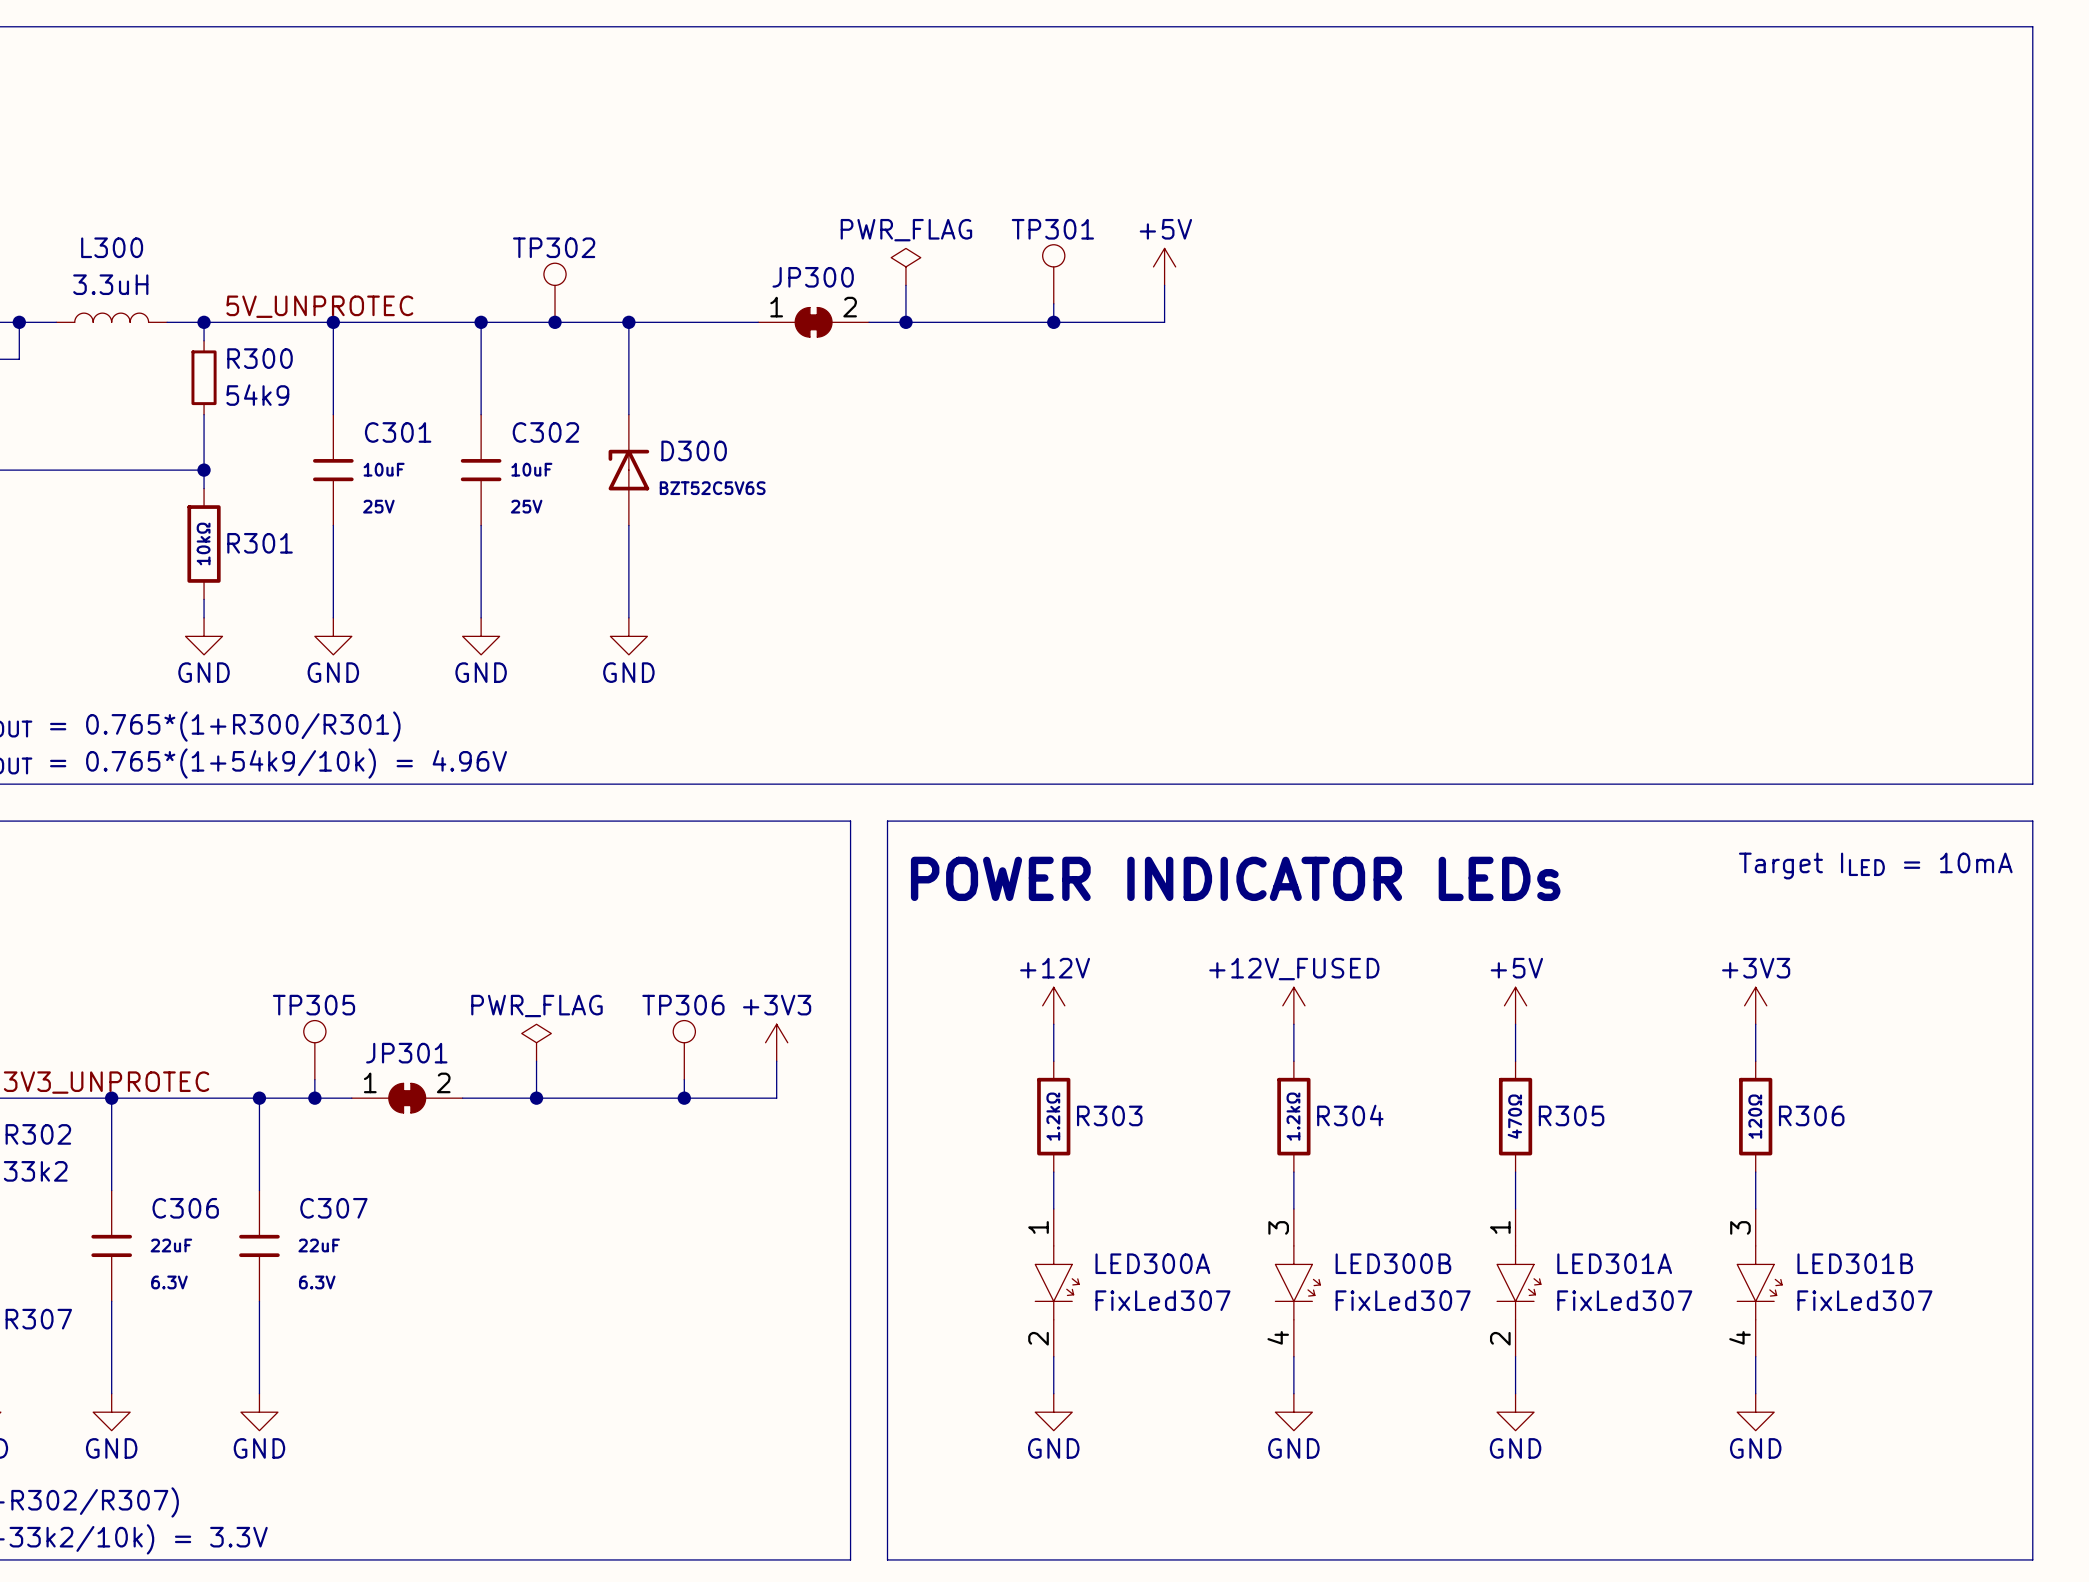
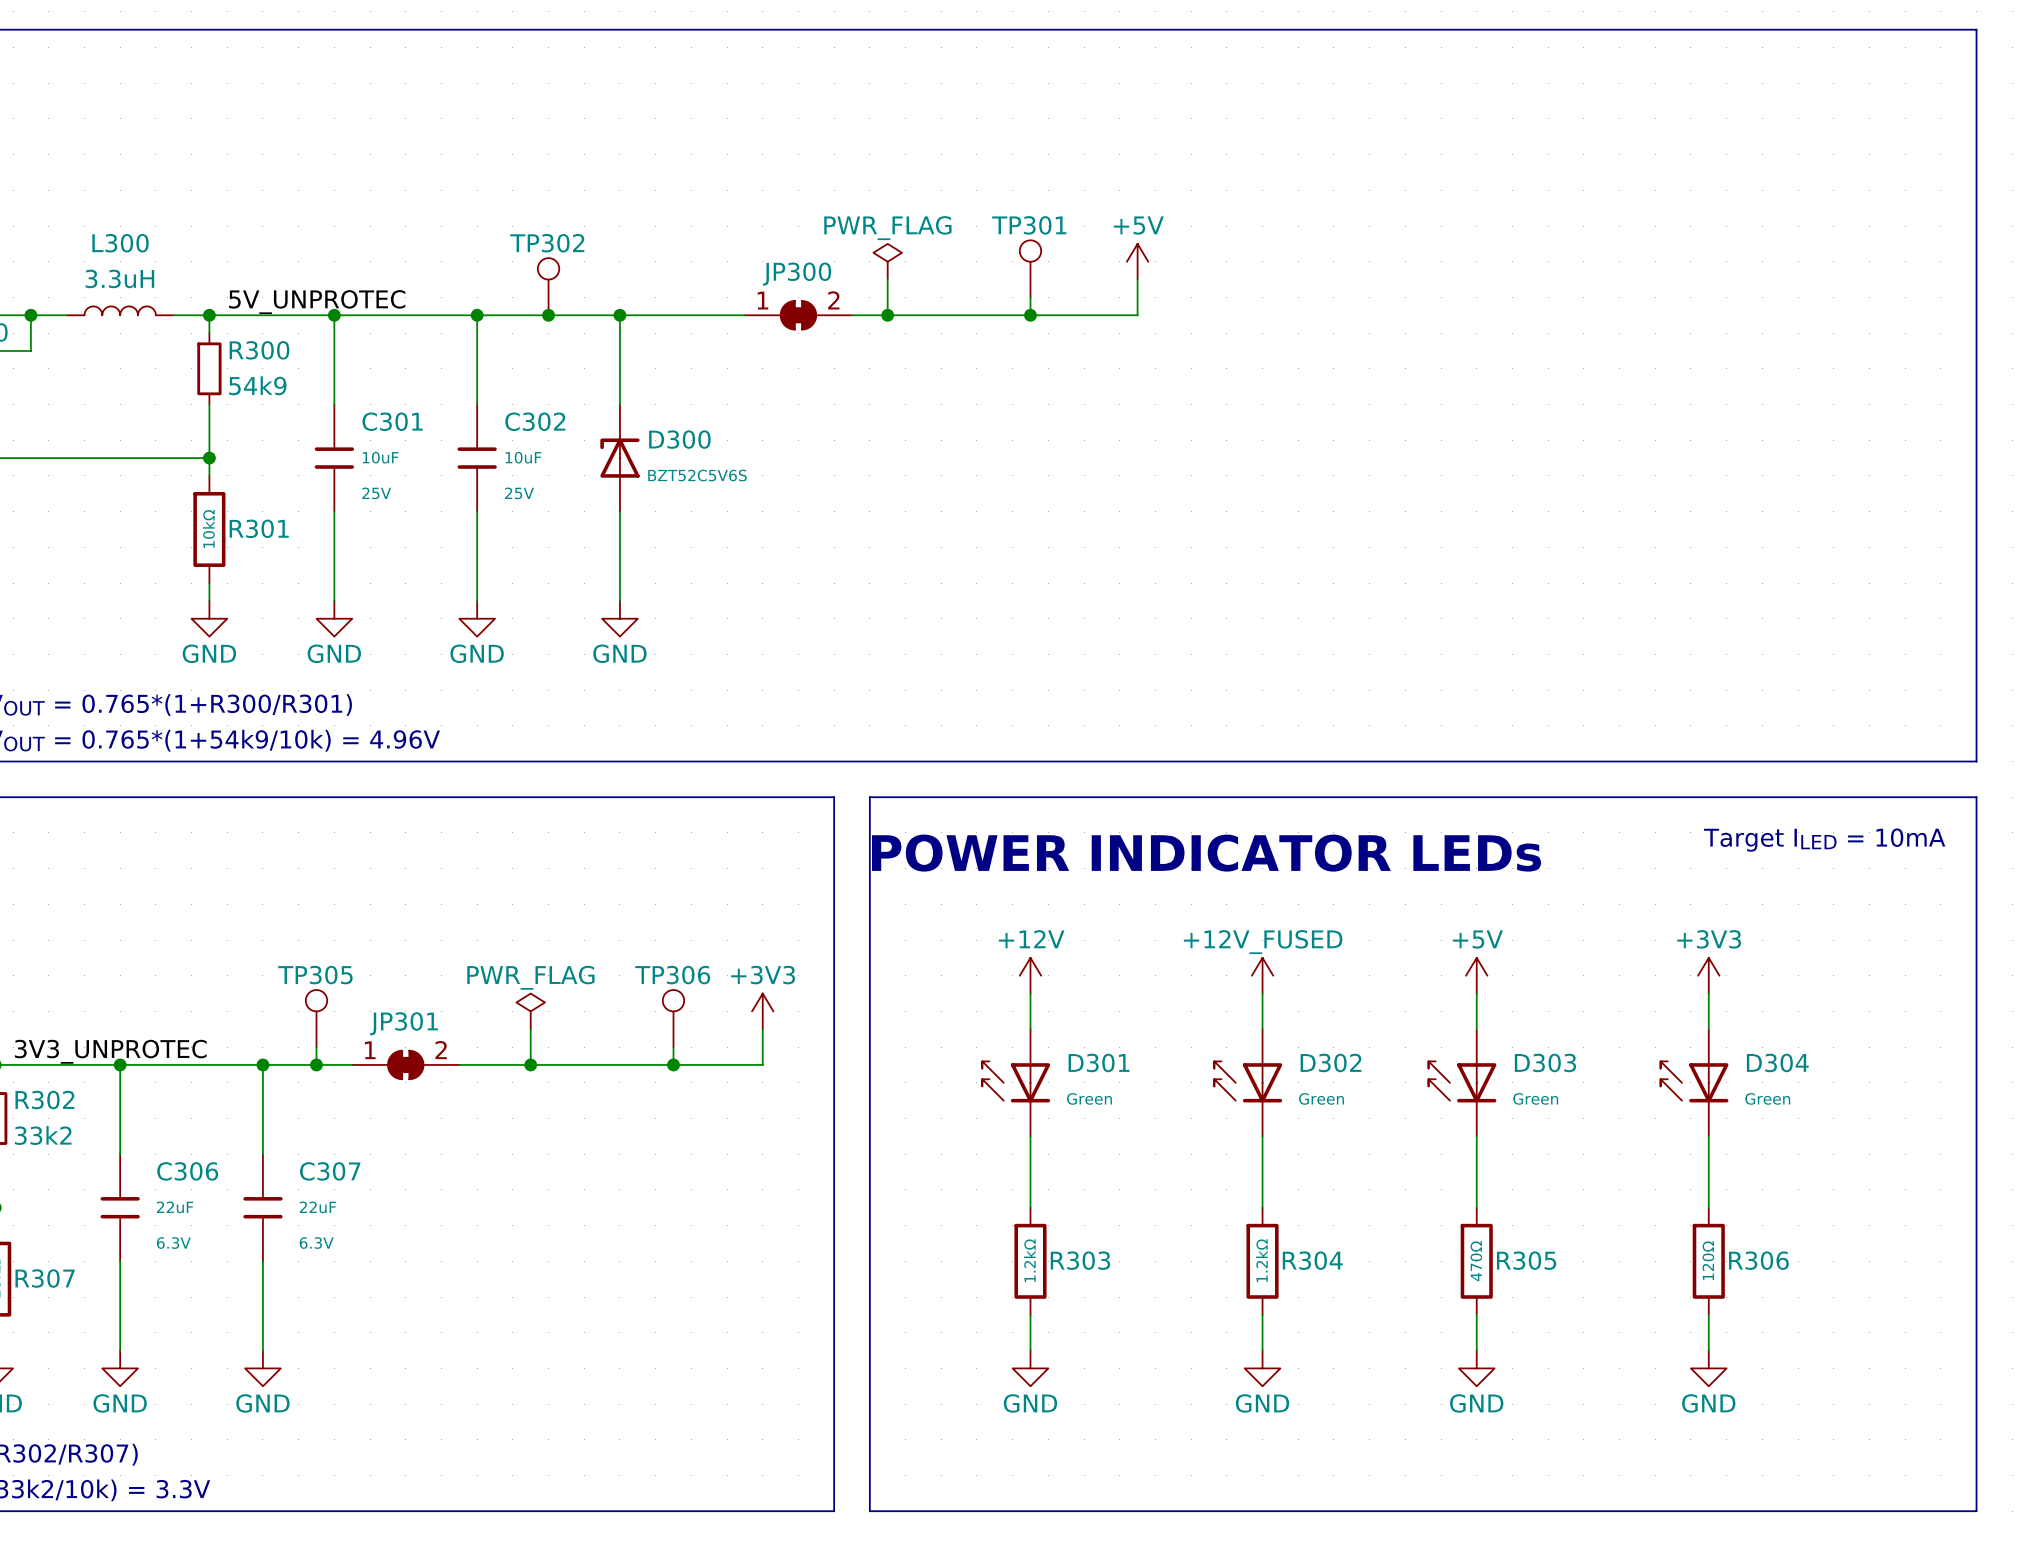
D301: none -> Green (1015, 1082)
R303 position: (1053, 1116) -> (1030, 1261)
D302: none -> Green (1247, 1082)
R304 position: (1293, 1116) -> (1262, 1261)
D303: none -> Green (1462, 1082)
R305 position: (1515, 1116) -> (1476, 1261)
D304: none -> Green (1694, 1082)
R306 position: (1755, 1116) -> (1708, 1261)
LED300A: FixLed307 (1057, 1282) -> none
LED300B: FixLed307 (1297, 1282) -> none
LED301A: FixLed307 (1518, 1282) -> none
LED301B: FixLed307 (1759, 1282) -> none

